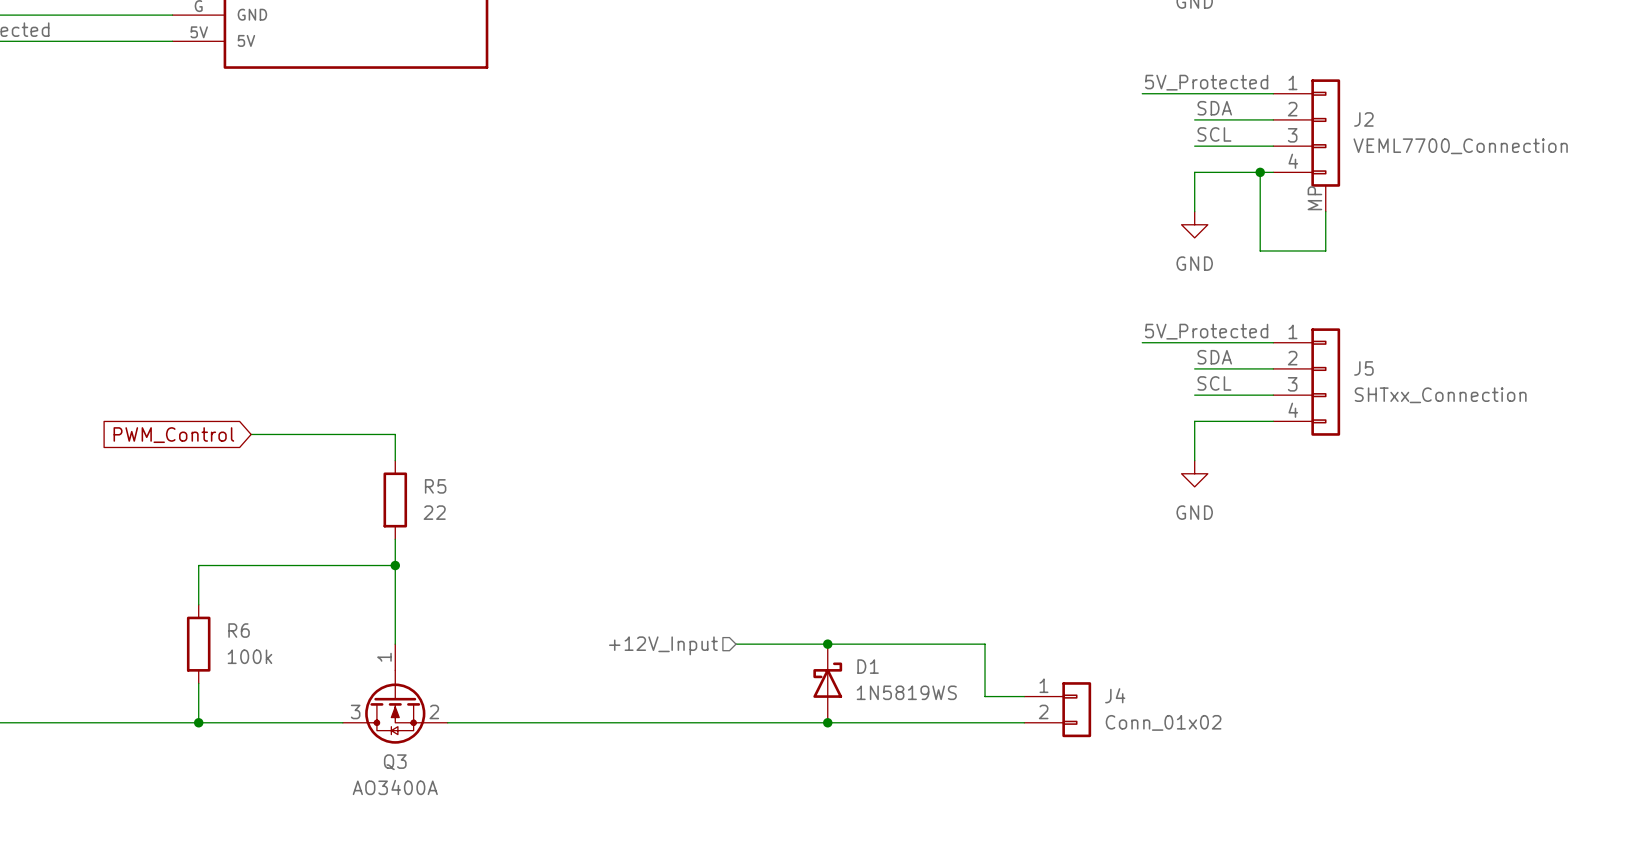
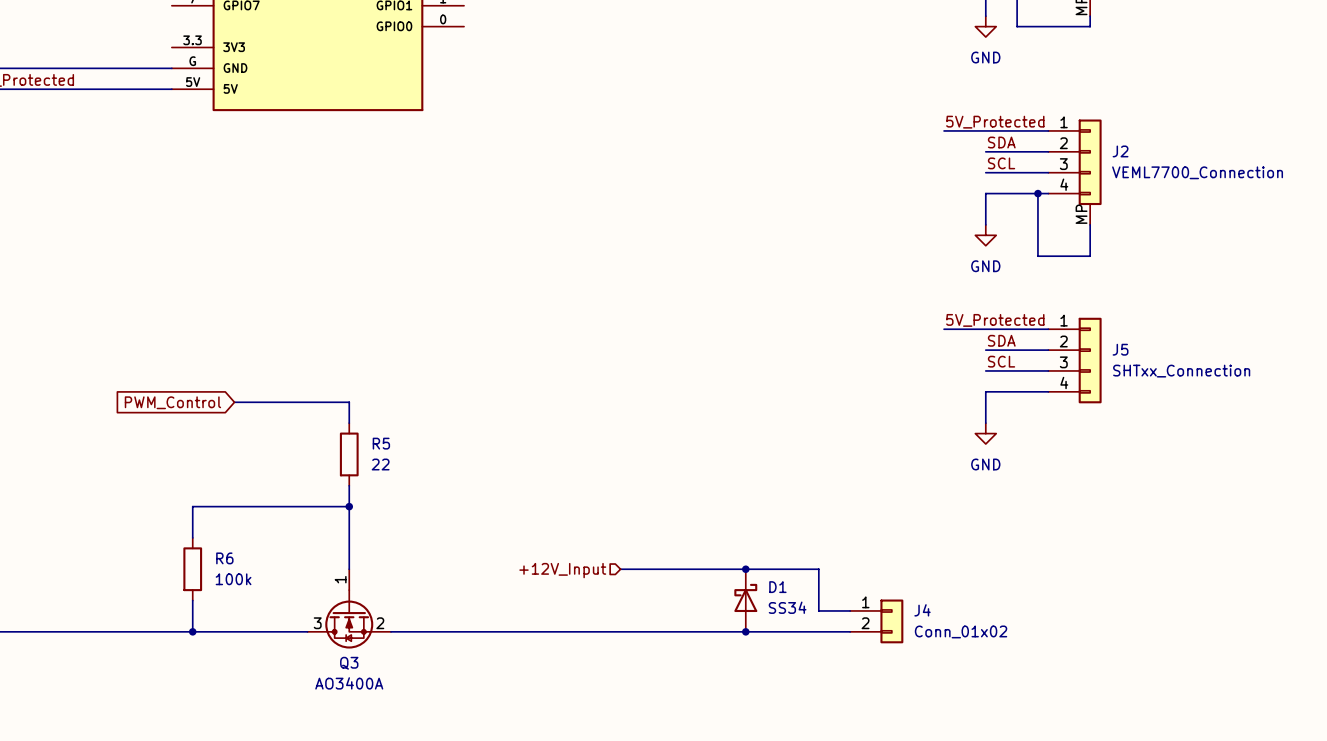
junction: (827, 644) -> none
junction: none -> (745, 569)
D1 position: (827, 683) -> (745, 600)
D1 value: 1N5819WS (906, 692) -> SS34 (787, 607)
junction: (827, 722) -> none
junction: none -> (745, 631)

